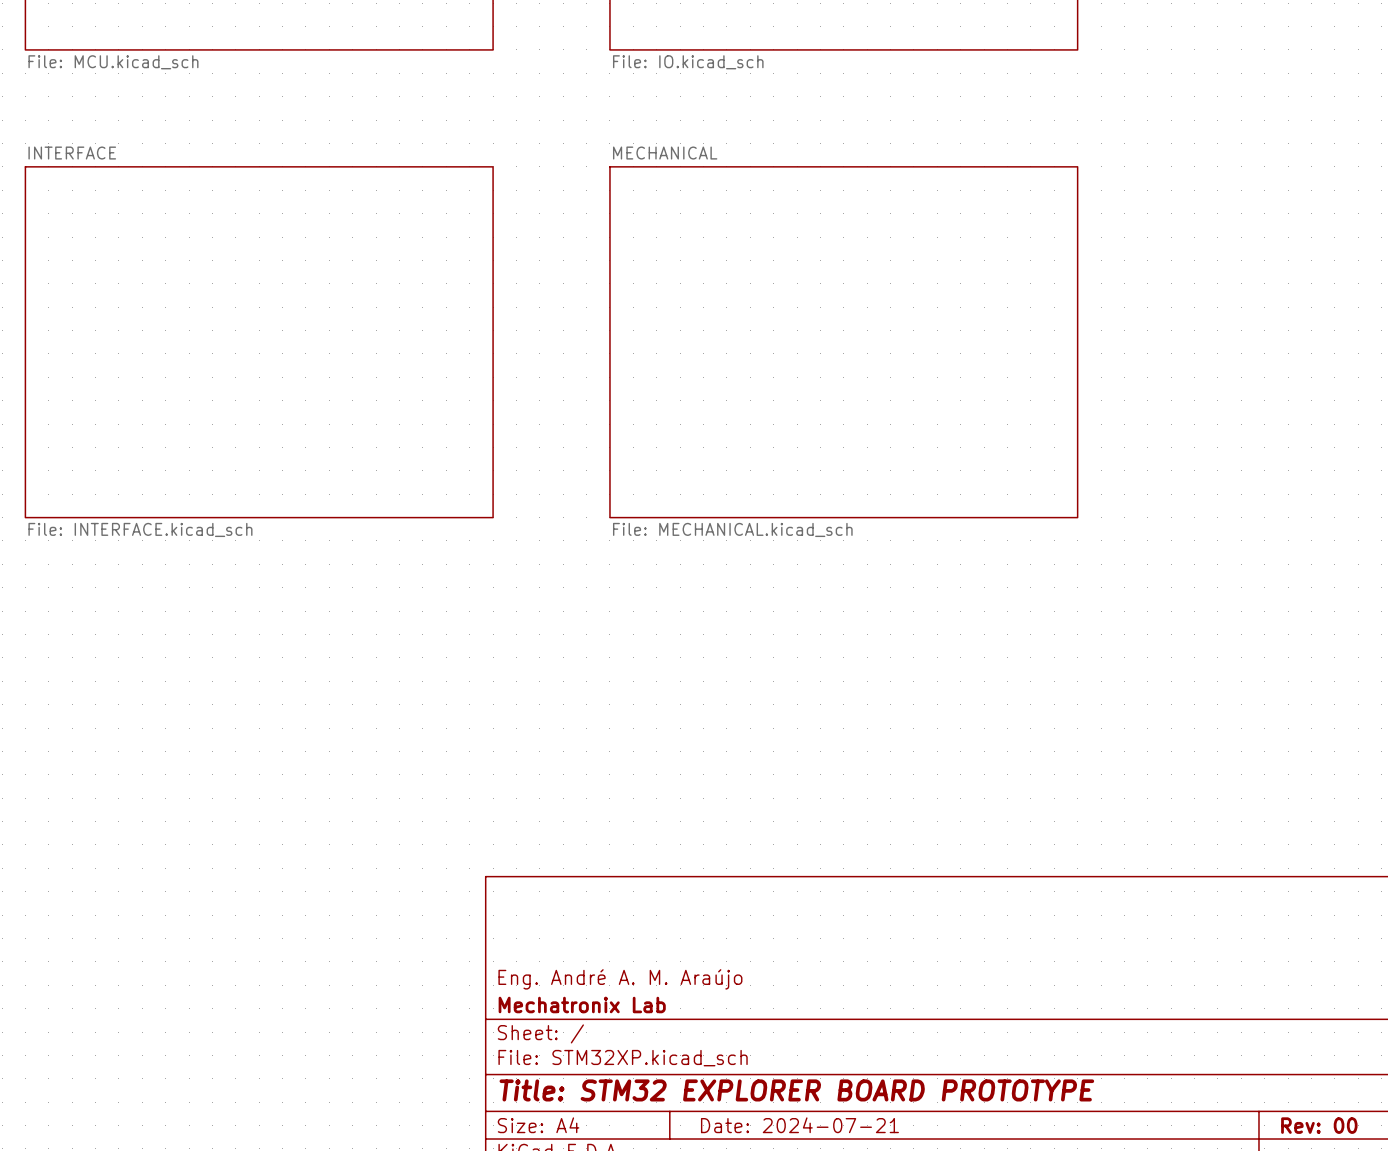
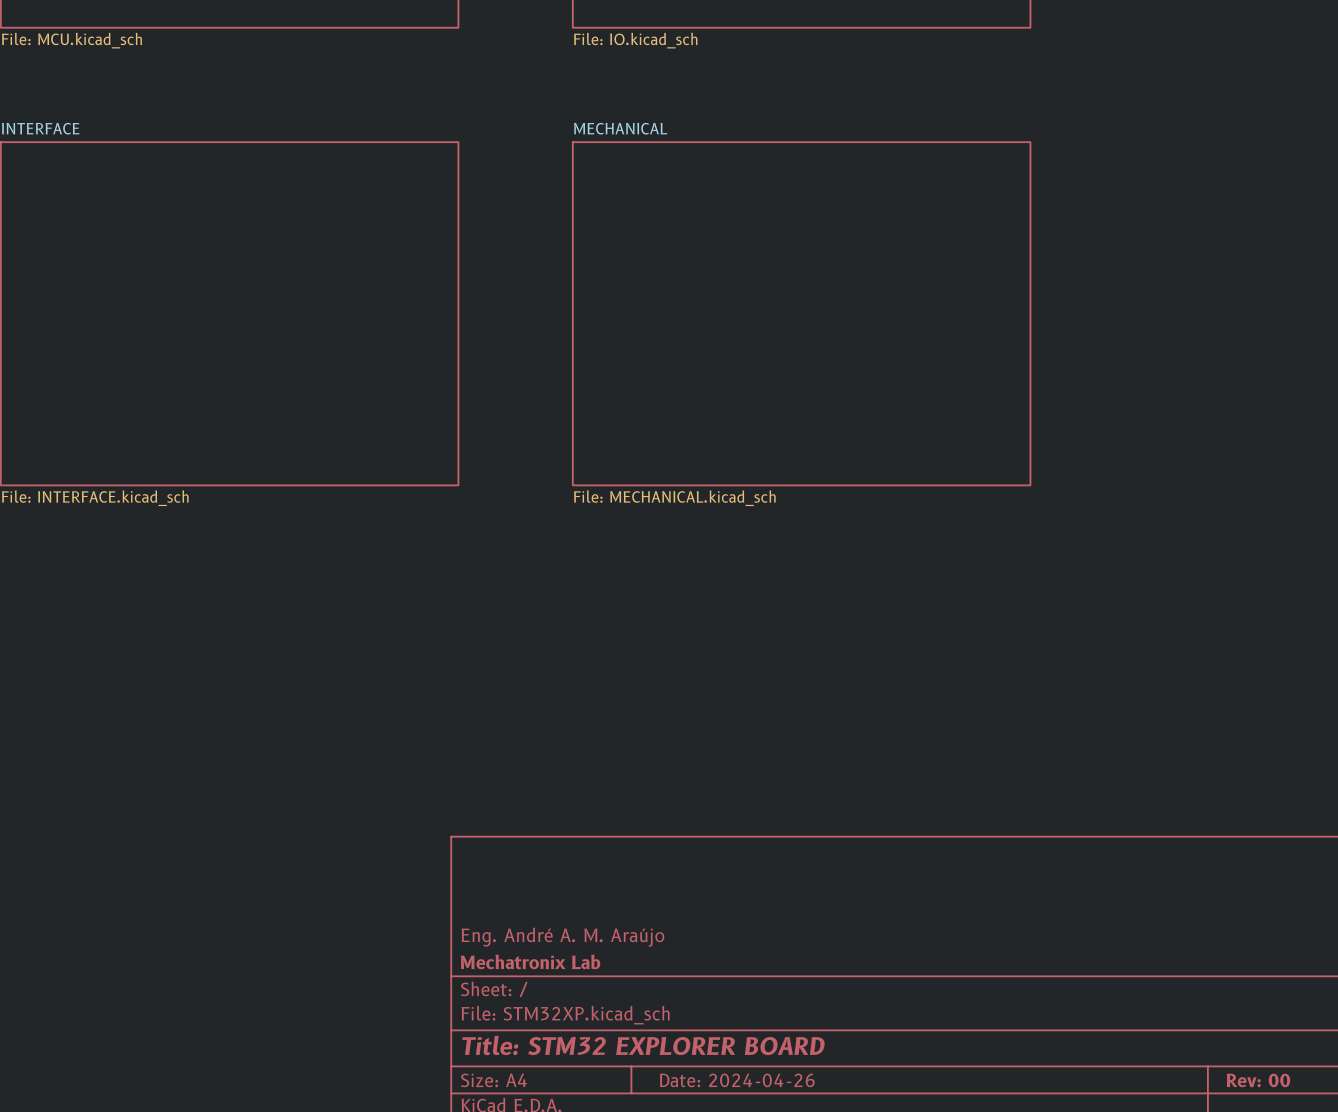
title block: Title: STM32 EXPLORER BOARD PROTOTYPE (796, 1090) -> Title: STM32 EXPLORER BOARD (643, 1045)
title block: Date: 2024-07-21 (799, 1125) -> Date: 2024-04-26 (737, 1080)

